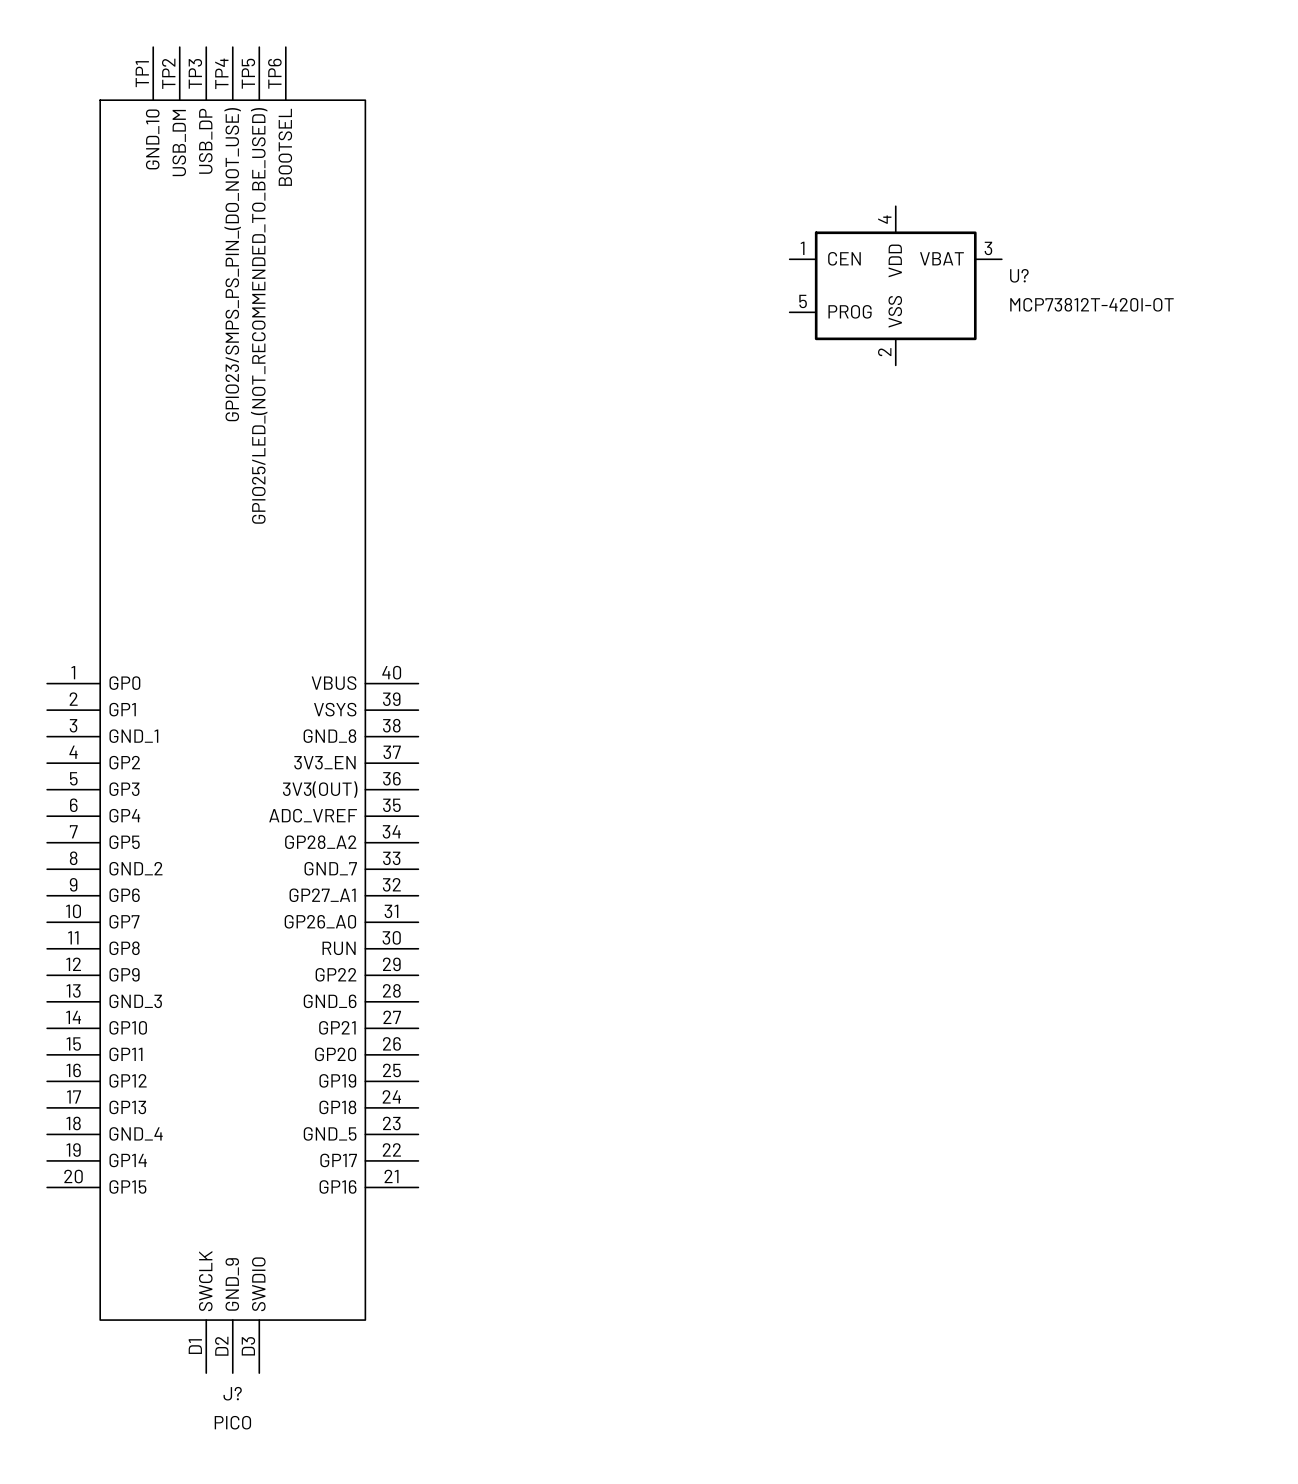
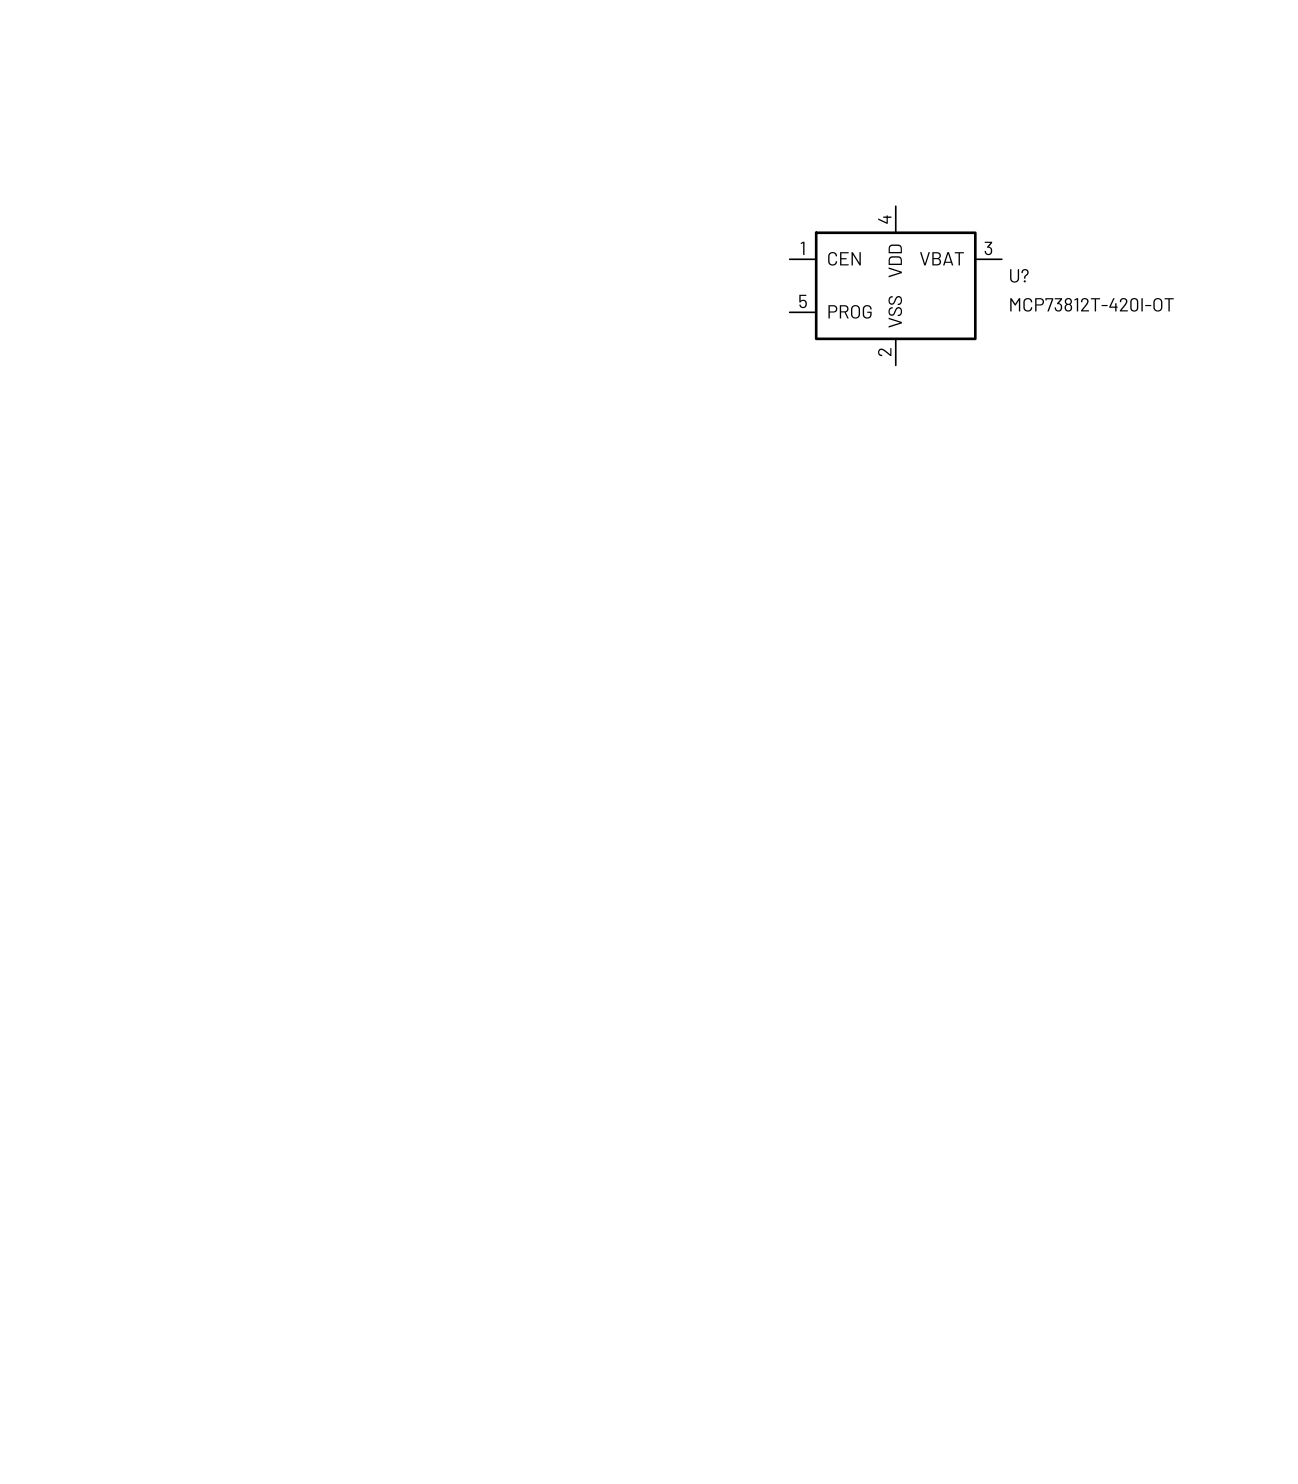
J?: PICO (232, 710) -> none

